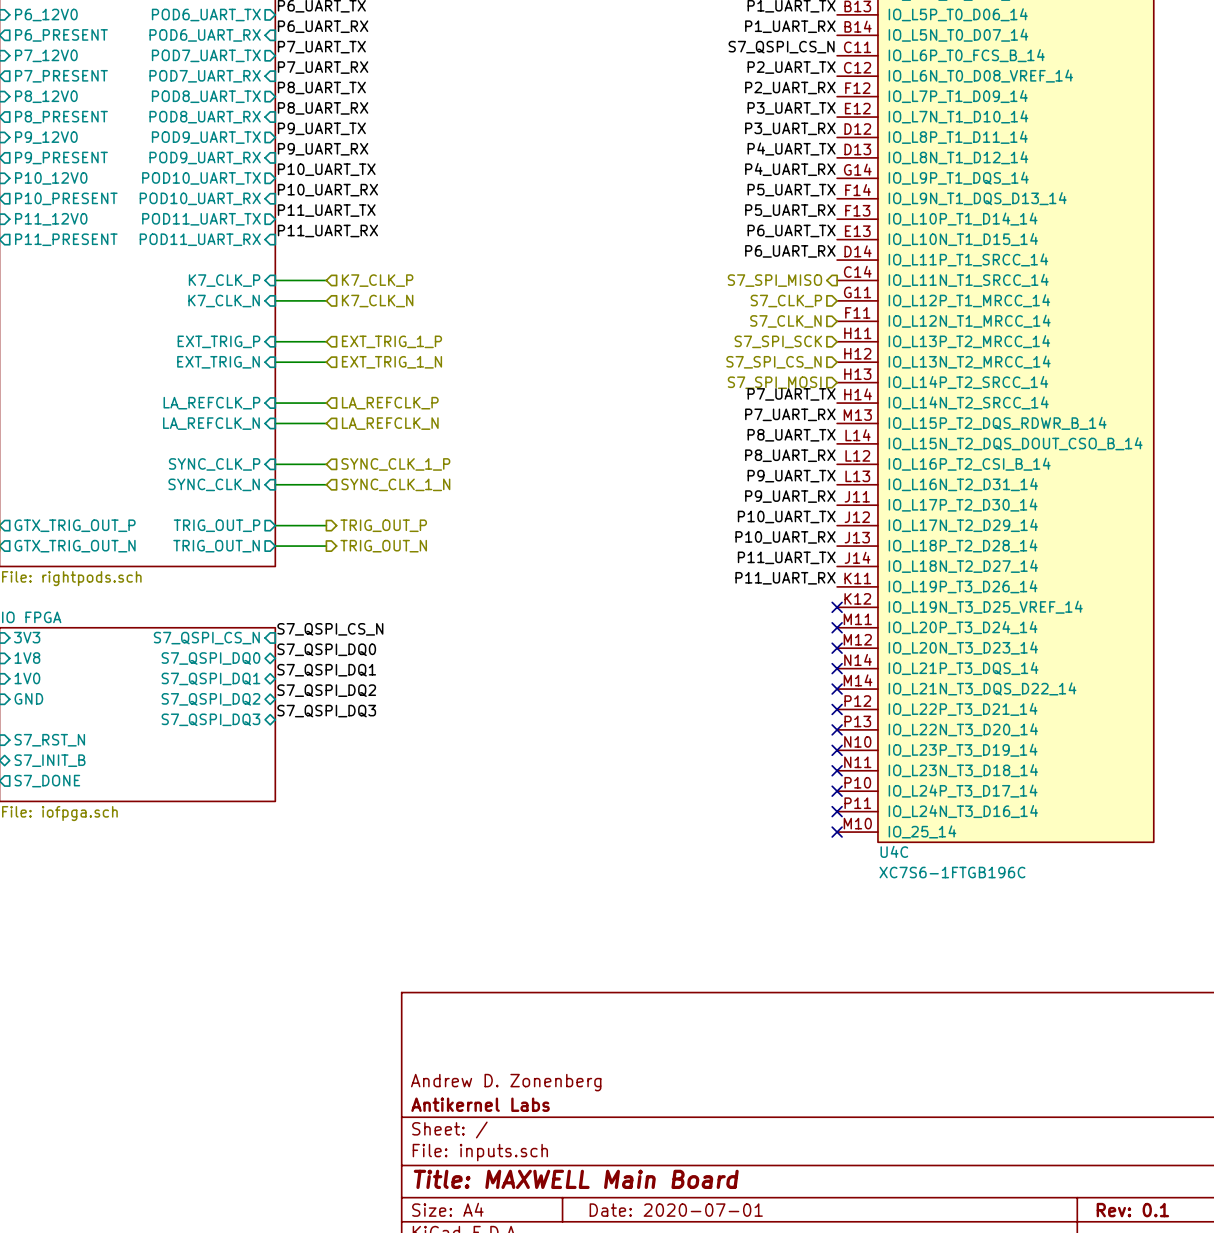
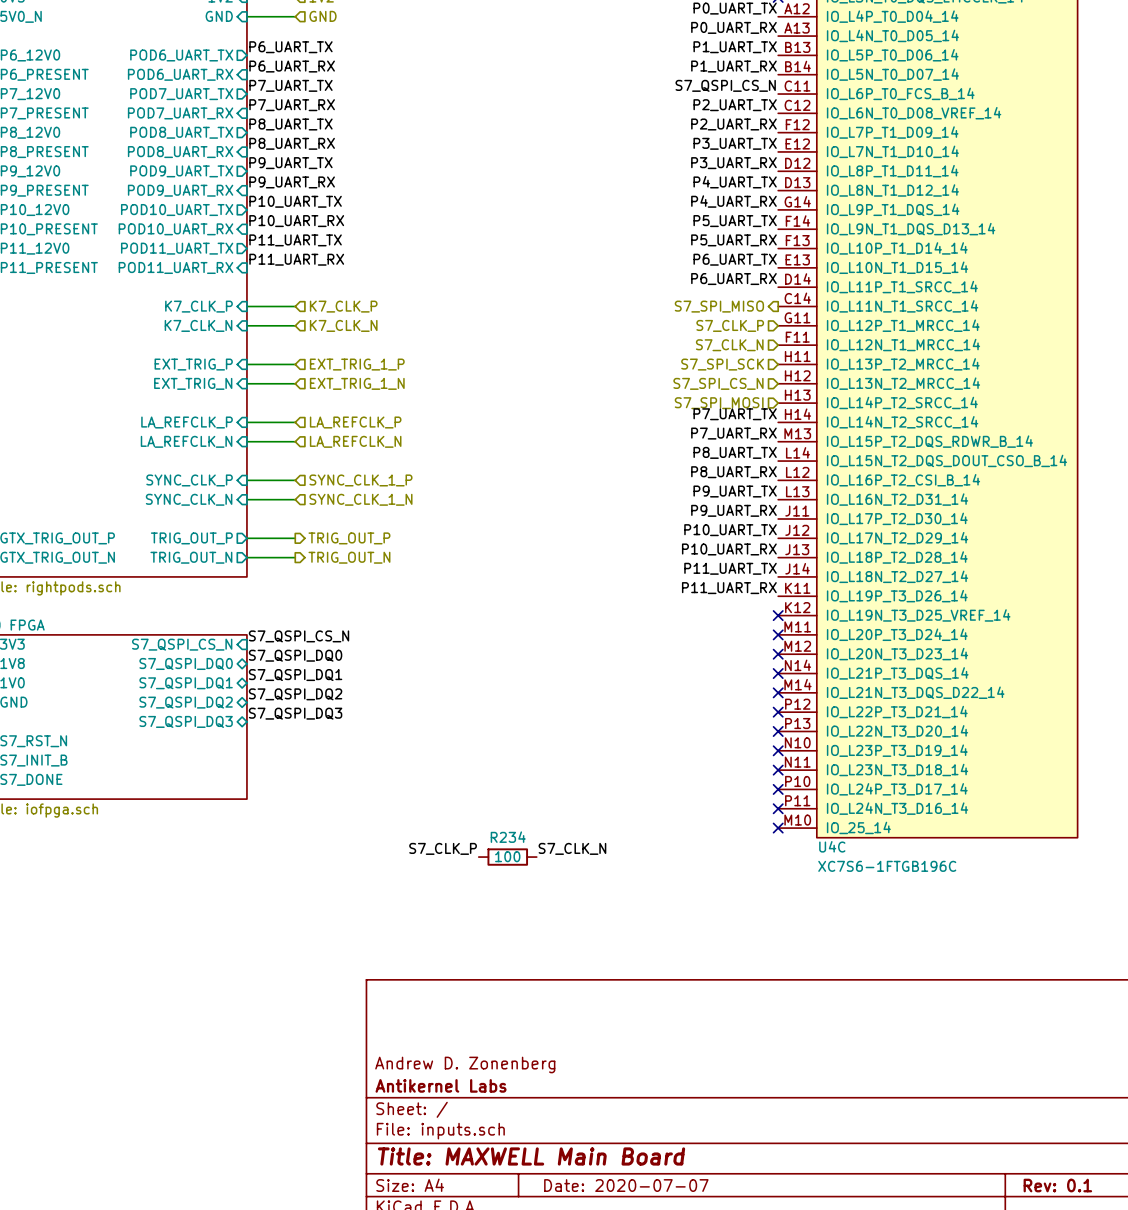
label: none -> S7_CLK_P (443, 848)
label: none -> S7_CLK_N (572, 848)
R234: none -> 100 (507, 857)
title block: Date: 2020-07-01 (676, 1210) -> Date: 2020-07-07 (626, 1185)

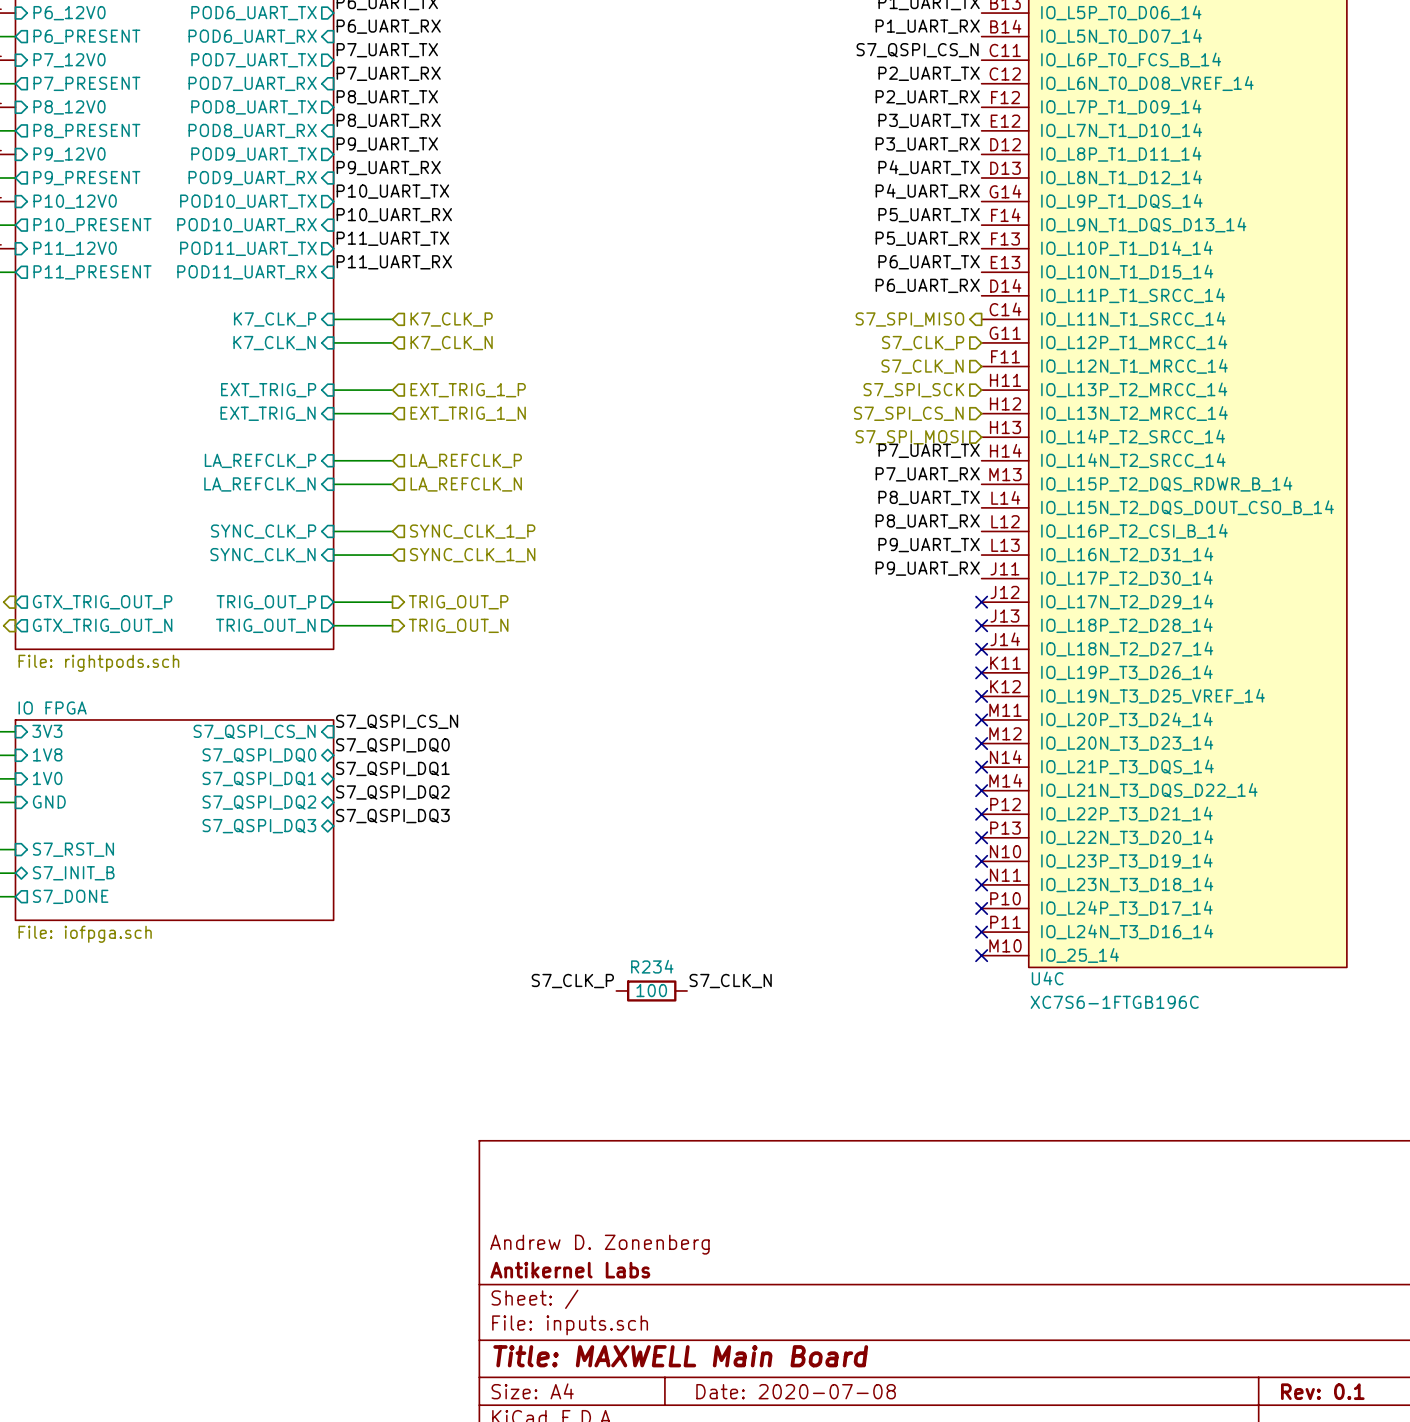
label: P10_UART_TX (730, 530) -> none
no-connect mark: none -> (981, 602)
label: P10_UART_RX (729, 549) -> none
no-connect mark: none -> (981, 625)
label: P11_UART_TX (730, 568) -> none
no-connect mark: none -> (981, 649)
label: P11_UART_RX (729, 588) -> none
no-connect mark: none -> (981, 672)
title block: Date: 2020-07-07 (626, 1185) -> Date: 2020-07-08 (796, 1391)

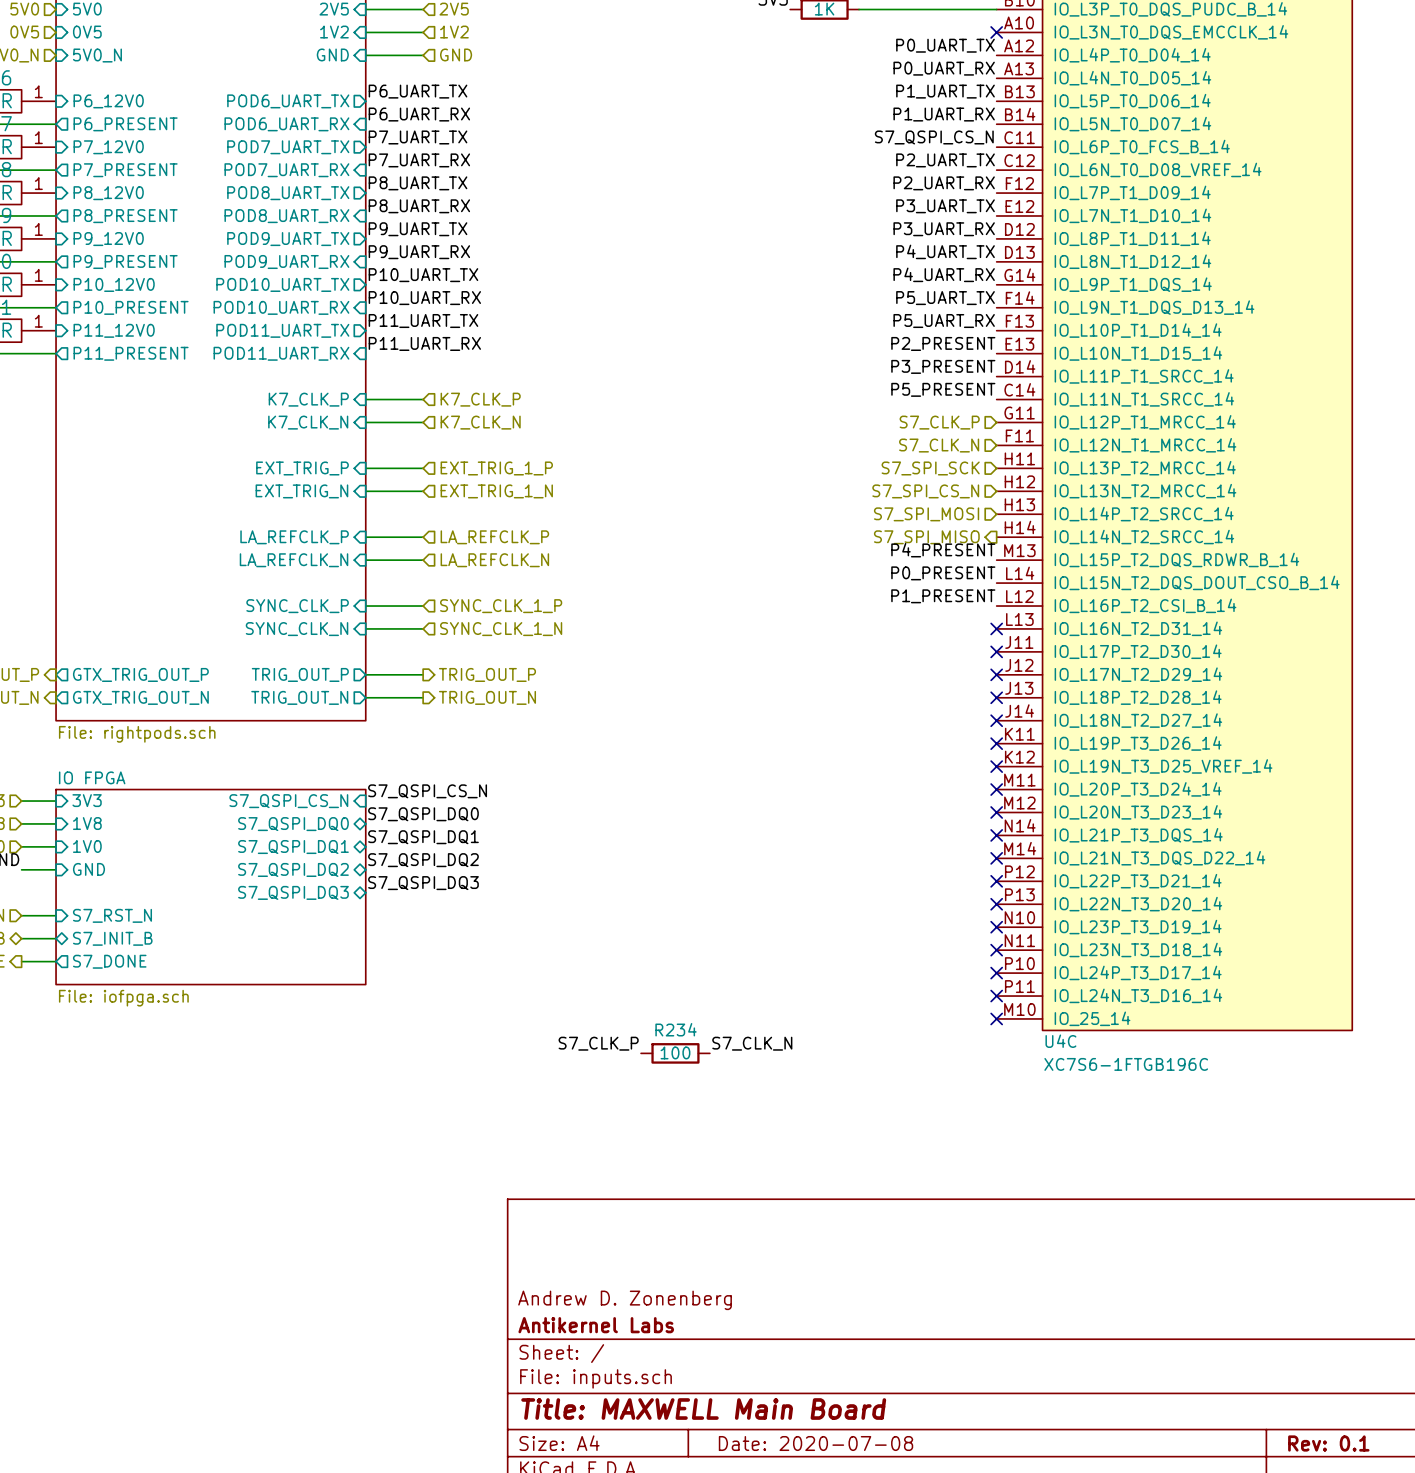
label: P6_UART_TX (929, 262) -> P2_PRESENT (943, 343)
label: P6_UART_RX (927, 285) -> P3_PRESENT (943, 366)
label: none -> P5_PRESENT (943, 389)
hierarchical label position: S7_SPI_MISO (909, 319) -> S7_SPI_MISO (926, 537)
label: P7_UART_TX (929, 450) -> none
label: P7_UART_RX (927, 474) -> P4_PRESENT (943, 550)
label: P8_UART_TX (929, 497) -> P0_PRESENT (943, 573)
label: P8_UART_RX (927, 521) -> P1_PRESENT (943, 596)
label: P9_UART_TX (929, 545) -> none
no-connect mark: none -> (996, 628)
label: P9_UART_RX (927, 568) -> none
no-connect mark: none -> (996, 651)

